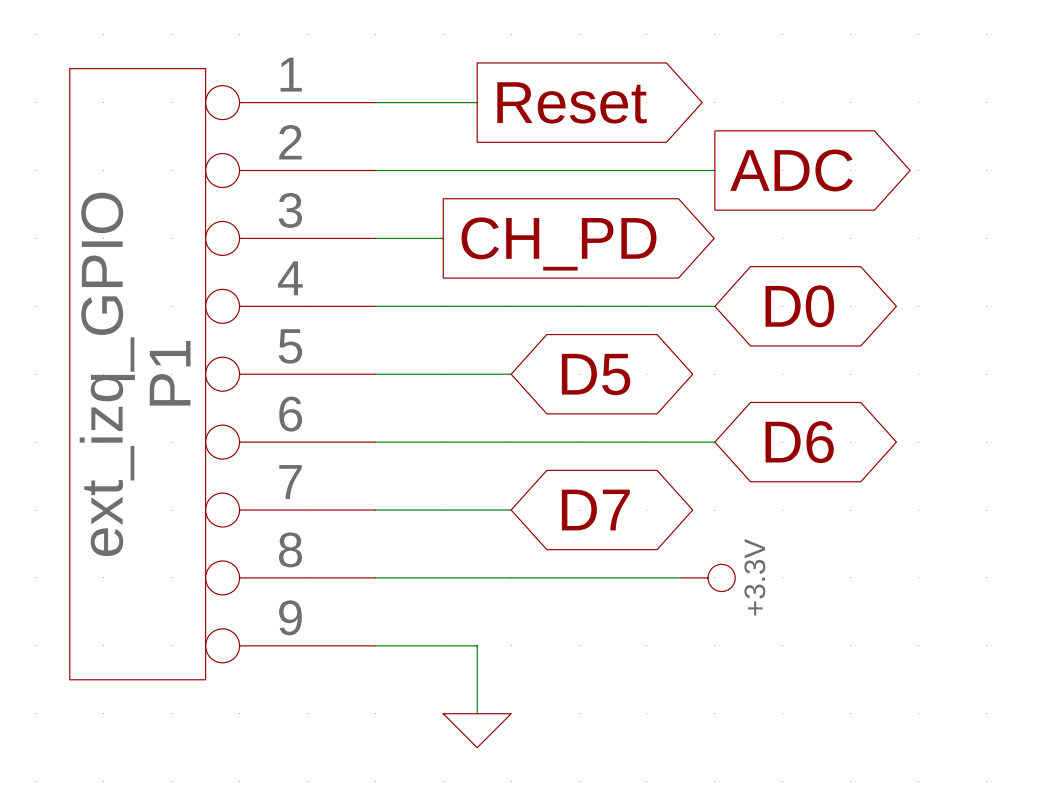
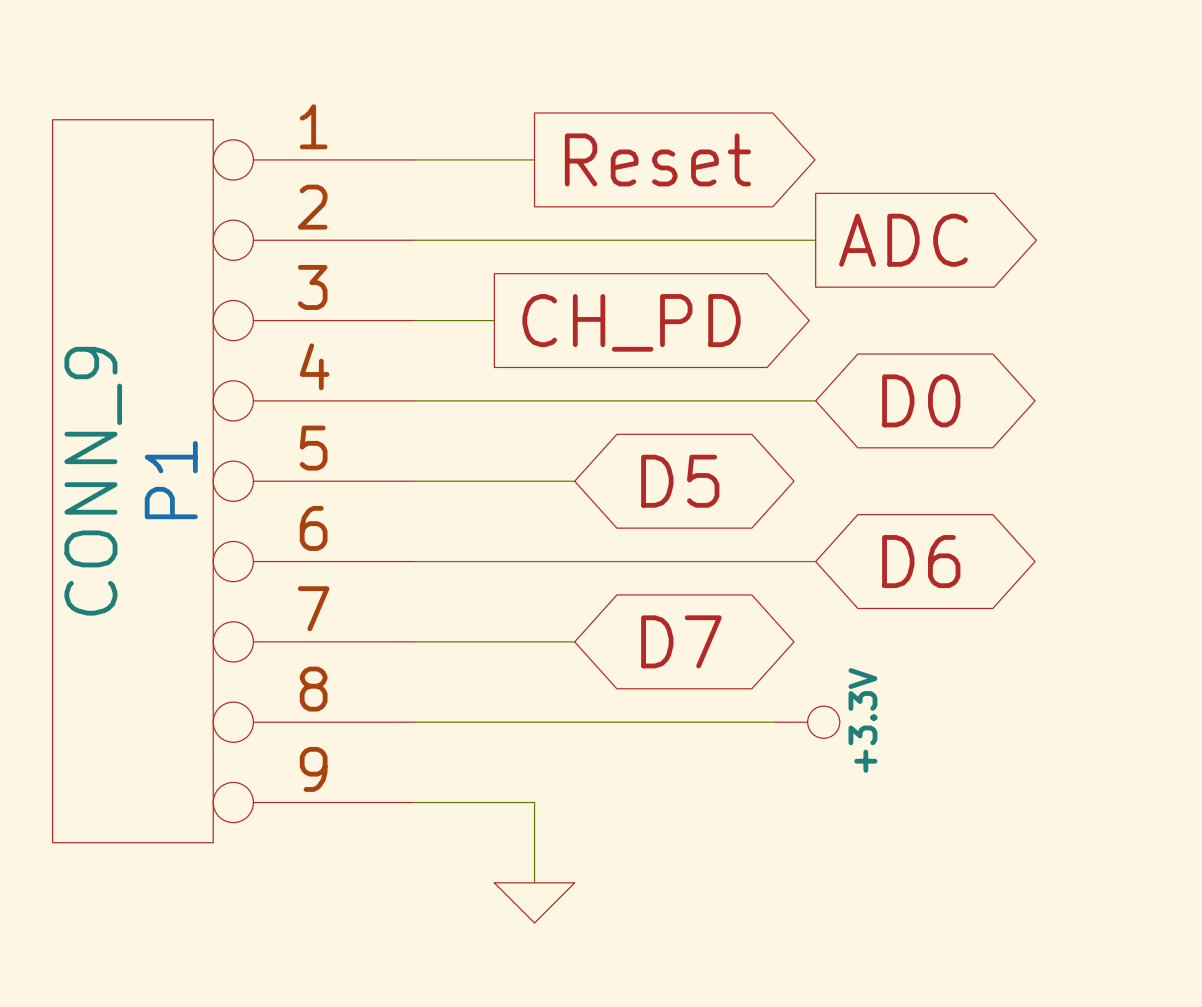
P1 value: ext_izq_GPIO (107, 374) -> CONN_9 (93, 481)

